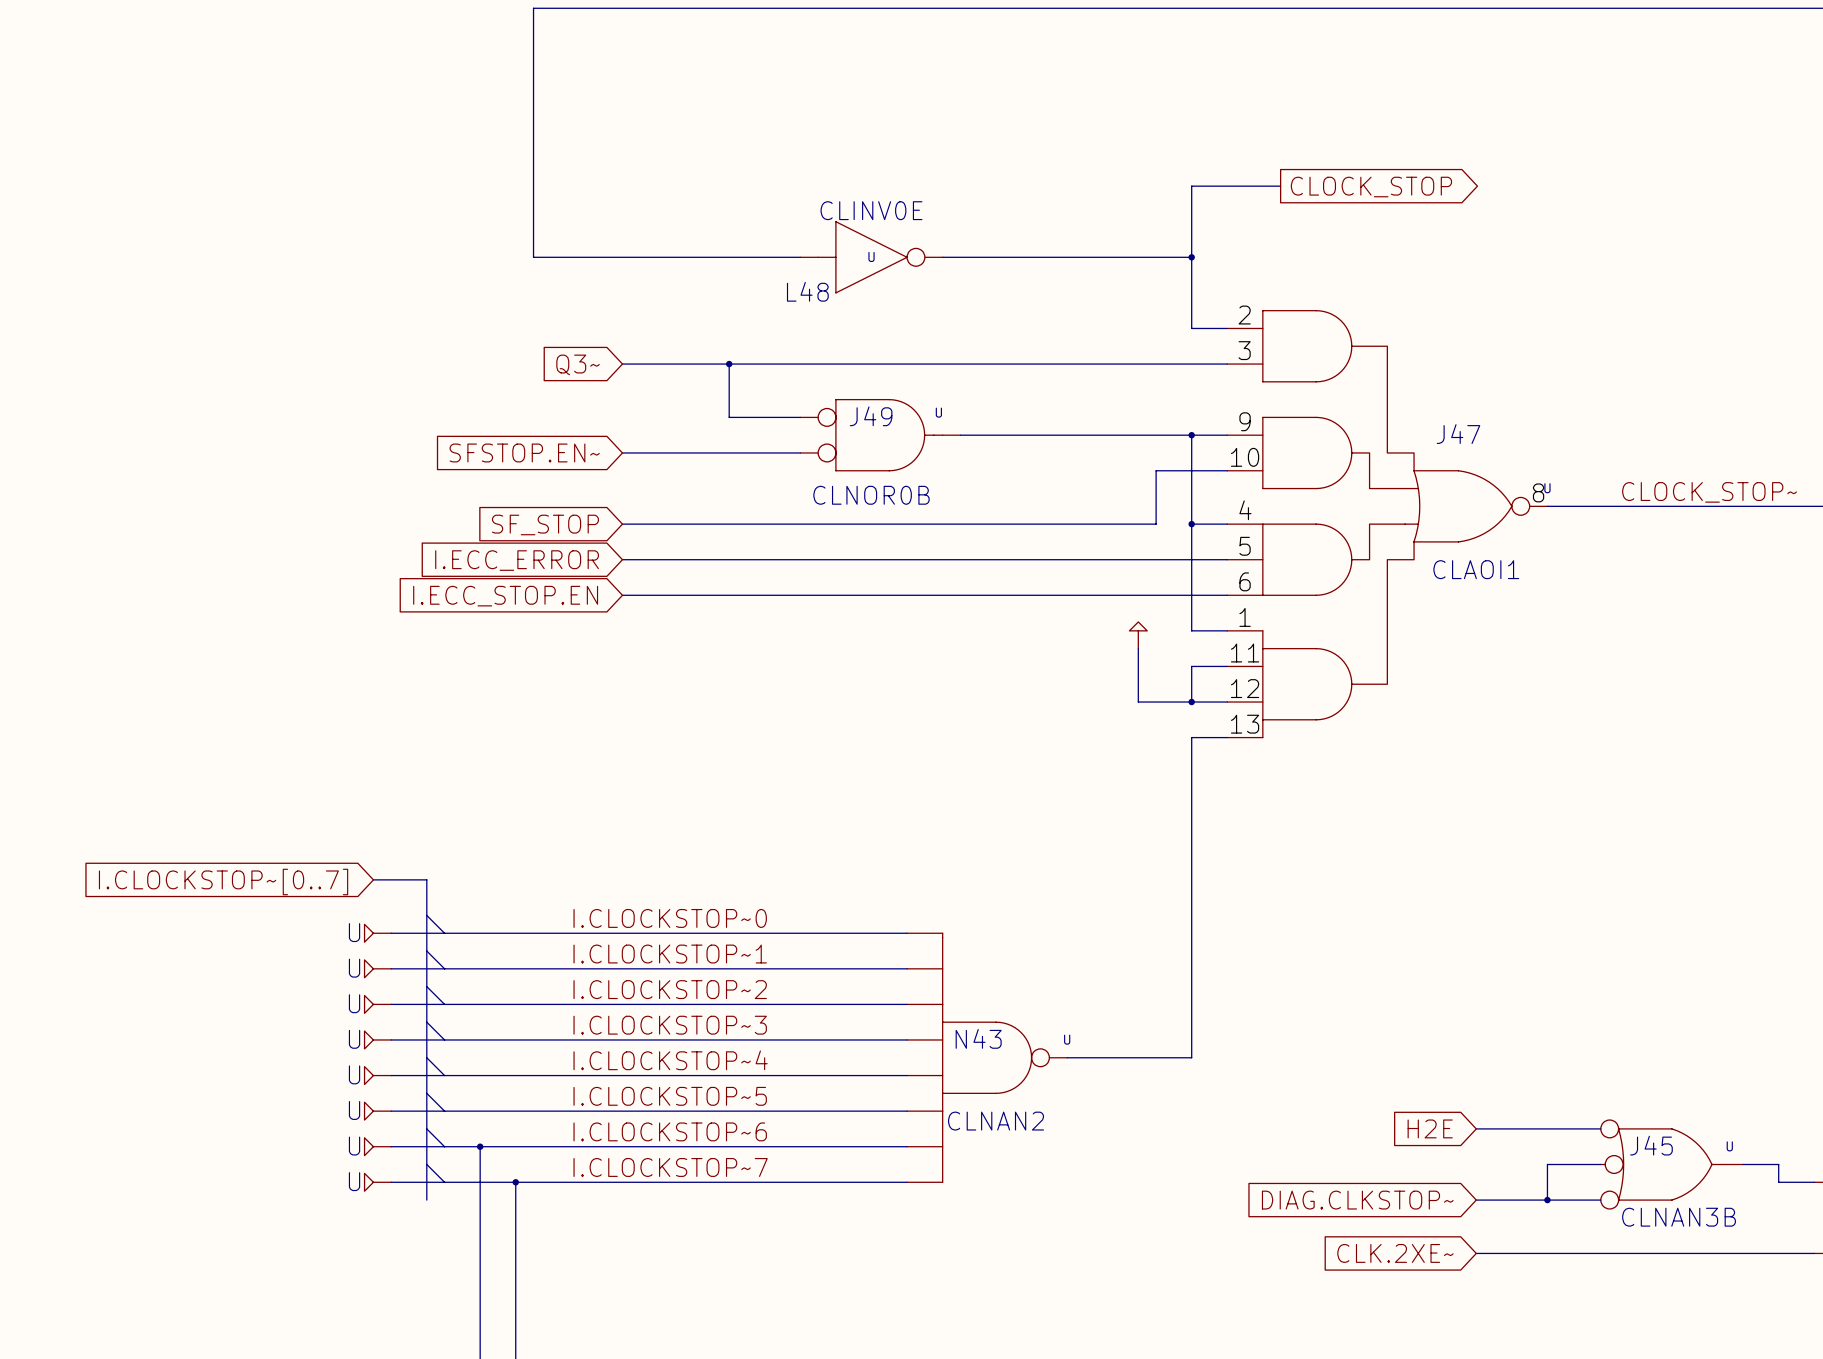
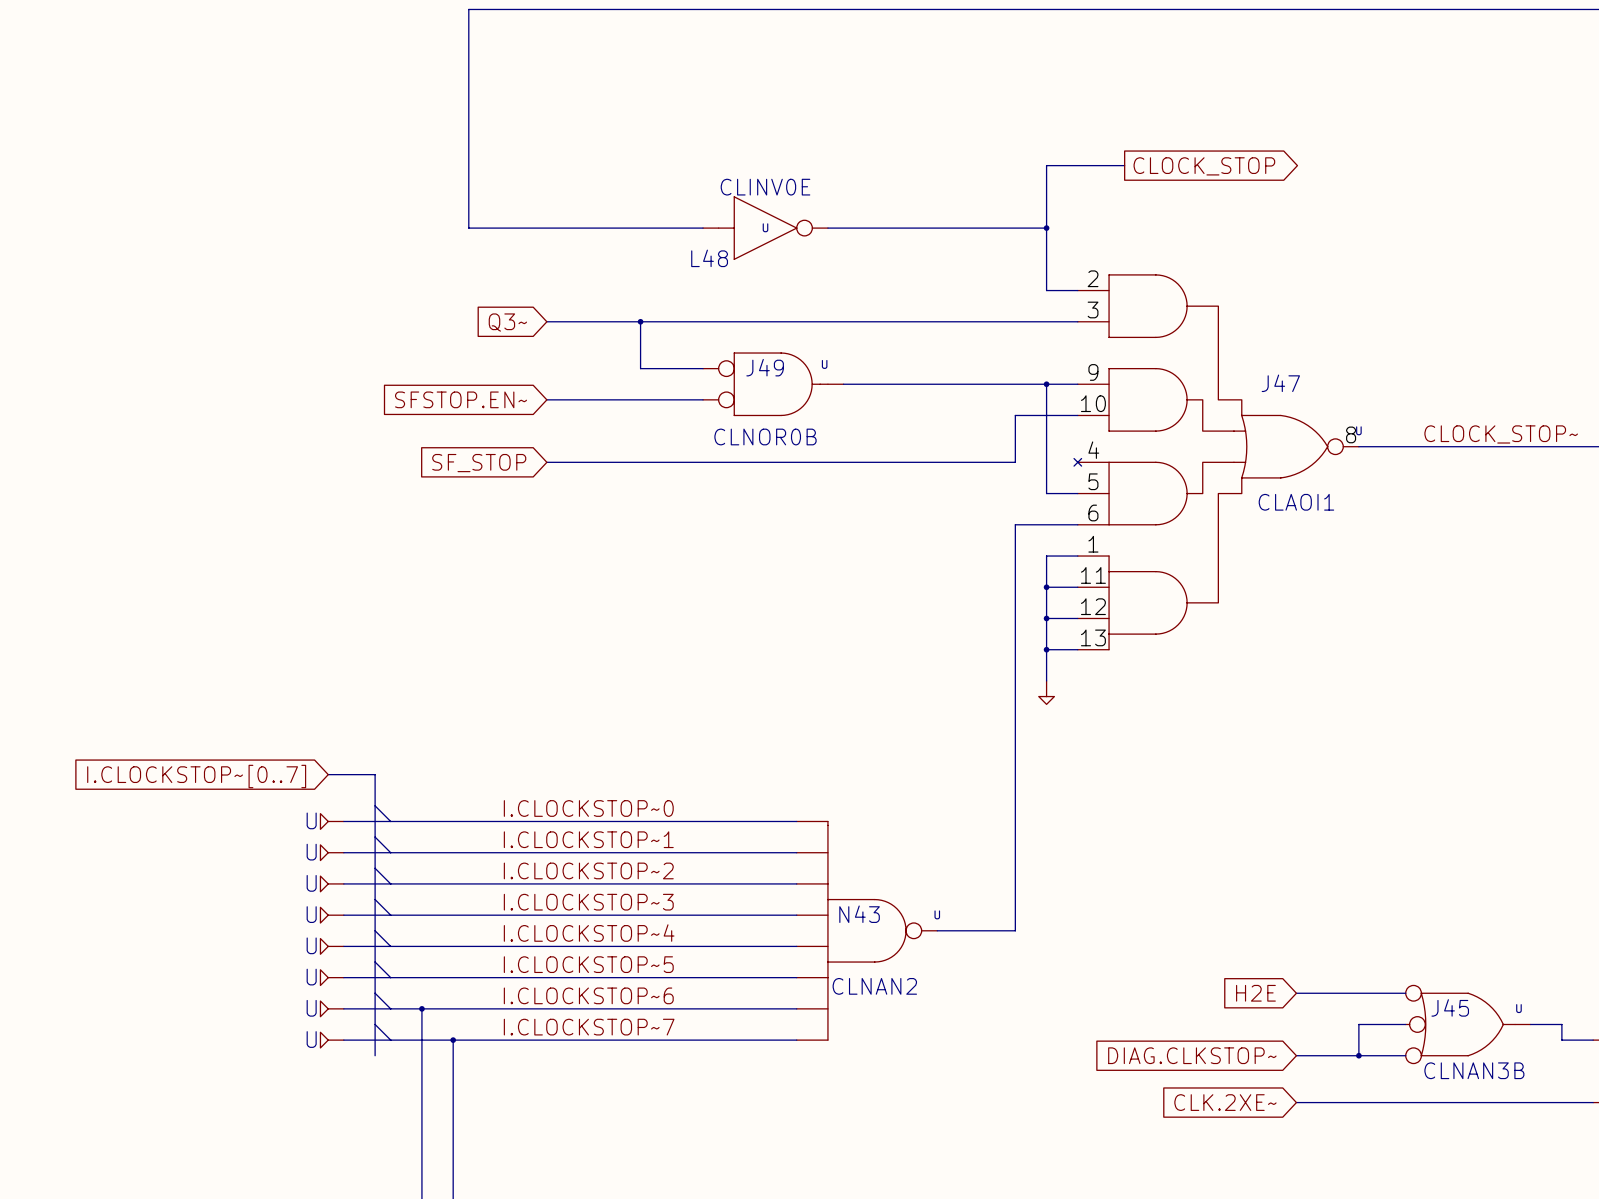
wire: (1191, 524) (1227, 524) -> none
junction: (1191, 524) -> none
no-connect mark: none -> (1077, 462)
wire: (622, 559) (1191, 559) (1191, 630) -> (1046, 587) (1046, 556)
global label: I.ECC_ERROR (517, 560) -> none
wire: (622, 595) (1156, 595) -> none
global label: I.ECC_STOP.EN (505, 596) -> none
power symbol rotation: 0° (1138, 626) -> 180° (1046, 700)
power symbol position: (1138, 635) -> (1046, 692)
wire: (1138, 648) (1138, 702) (1191, 702) -> (1046, 649) (1046, 618)
junction: none -> (1046, 587)
junction: none -> (1046, 649)
wire: (1191, 773) (1191, 1057) (1156, 1057) -> (1015, 524) (1015, 930)

